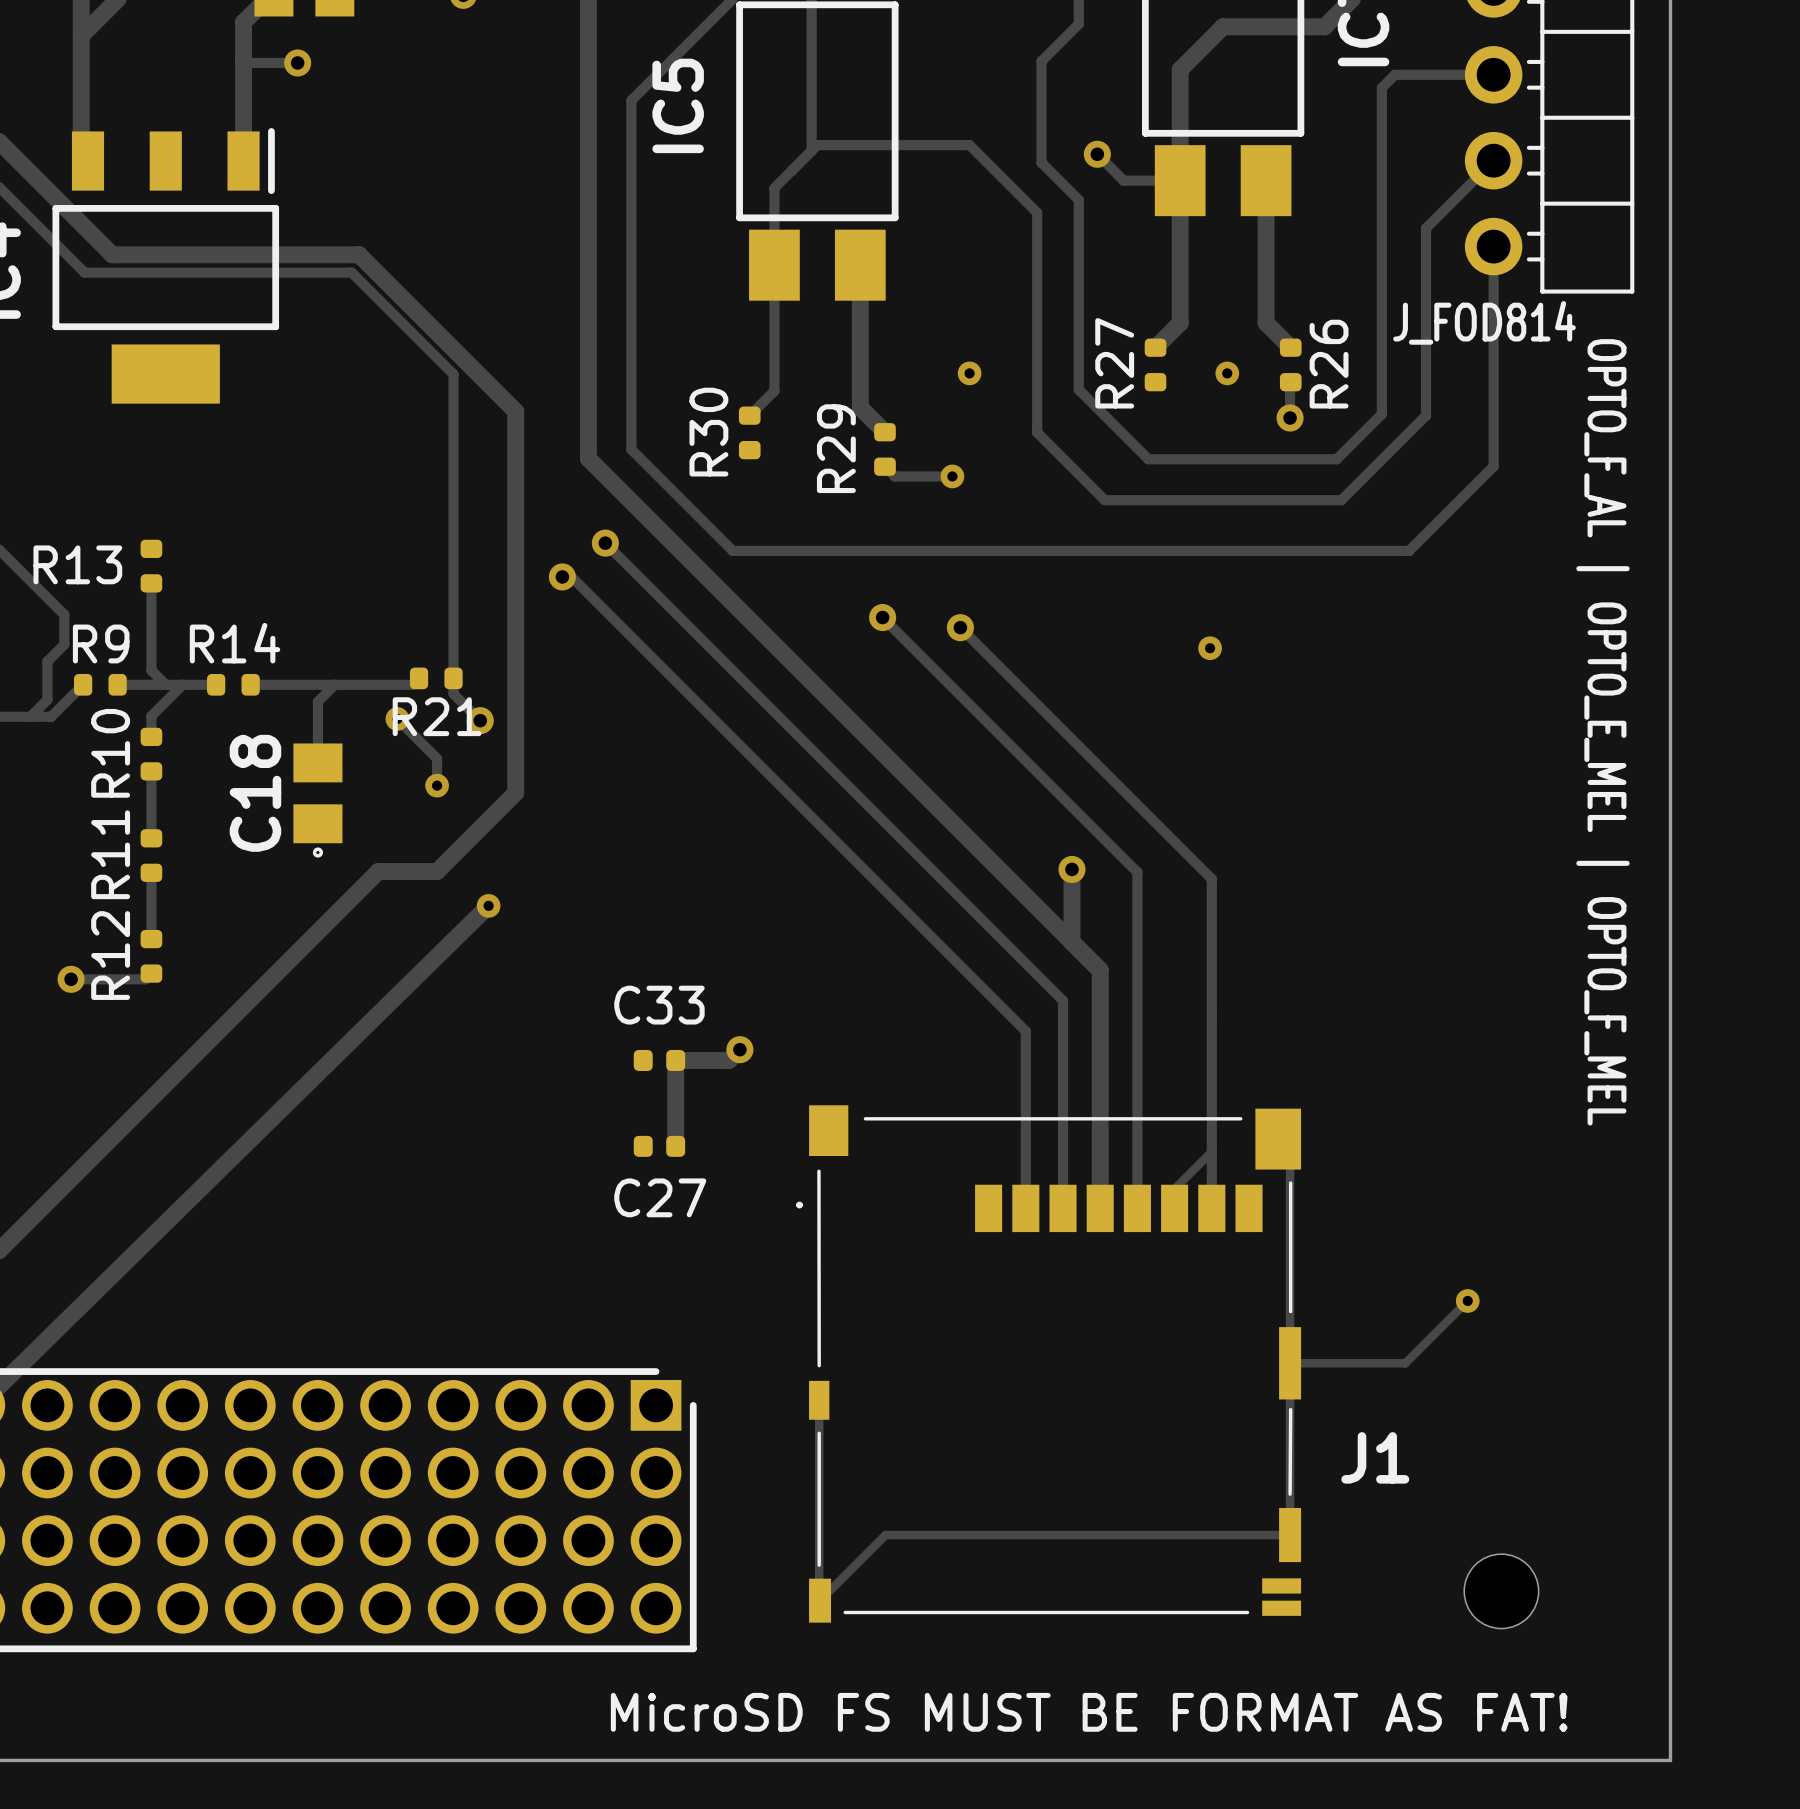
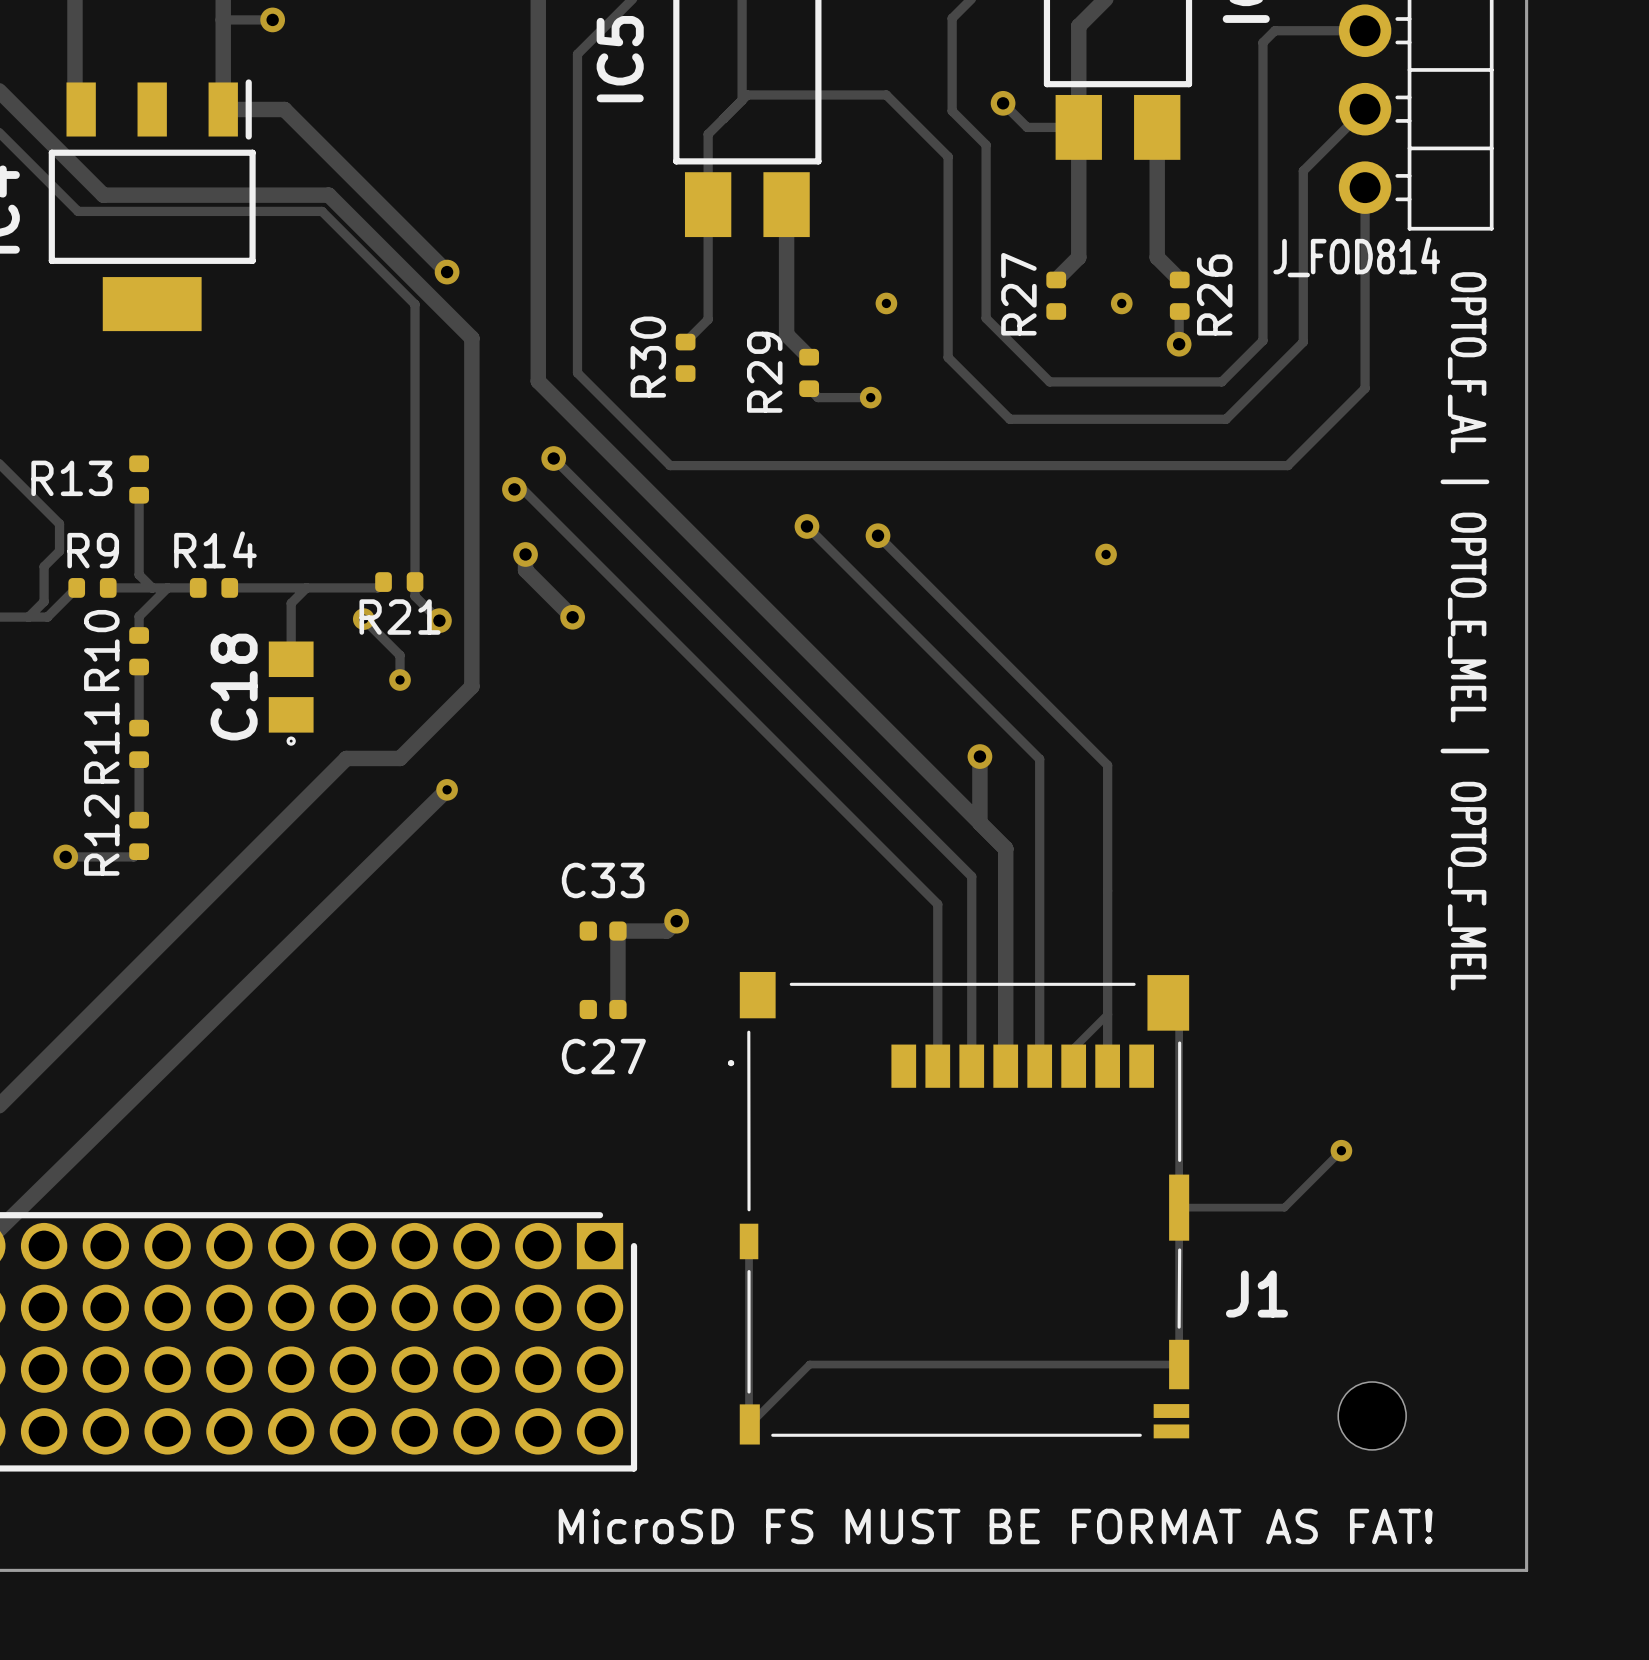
track: none -> (223, 109) (284, 109) (447, 272)
via: none -> (447, 272)
track: none -> (525, 554) (525, 570) (572, 617)
via: none -> (525, 554)
via: none -> (572, 617)

